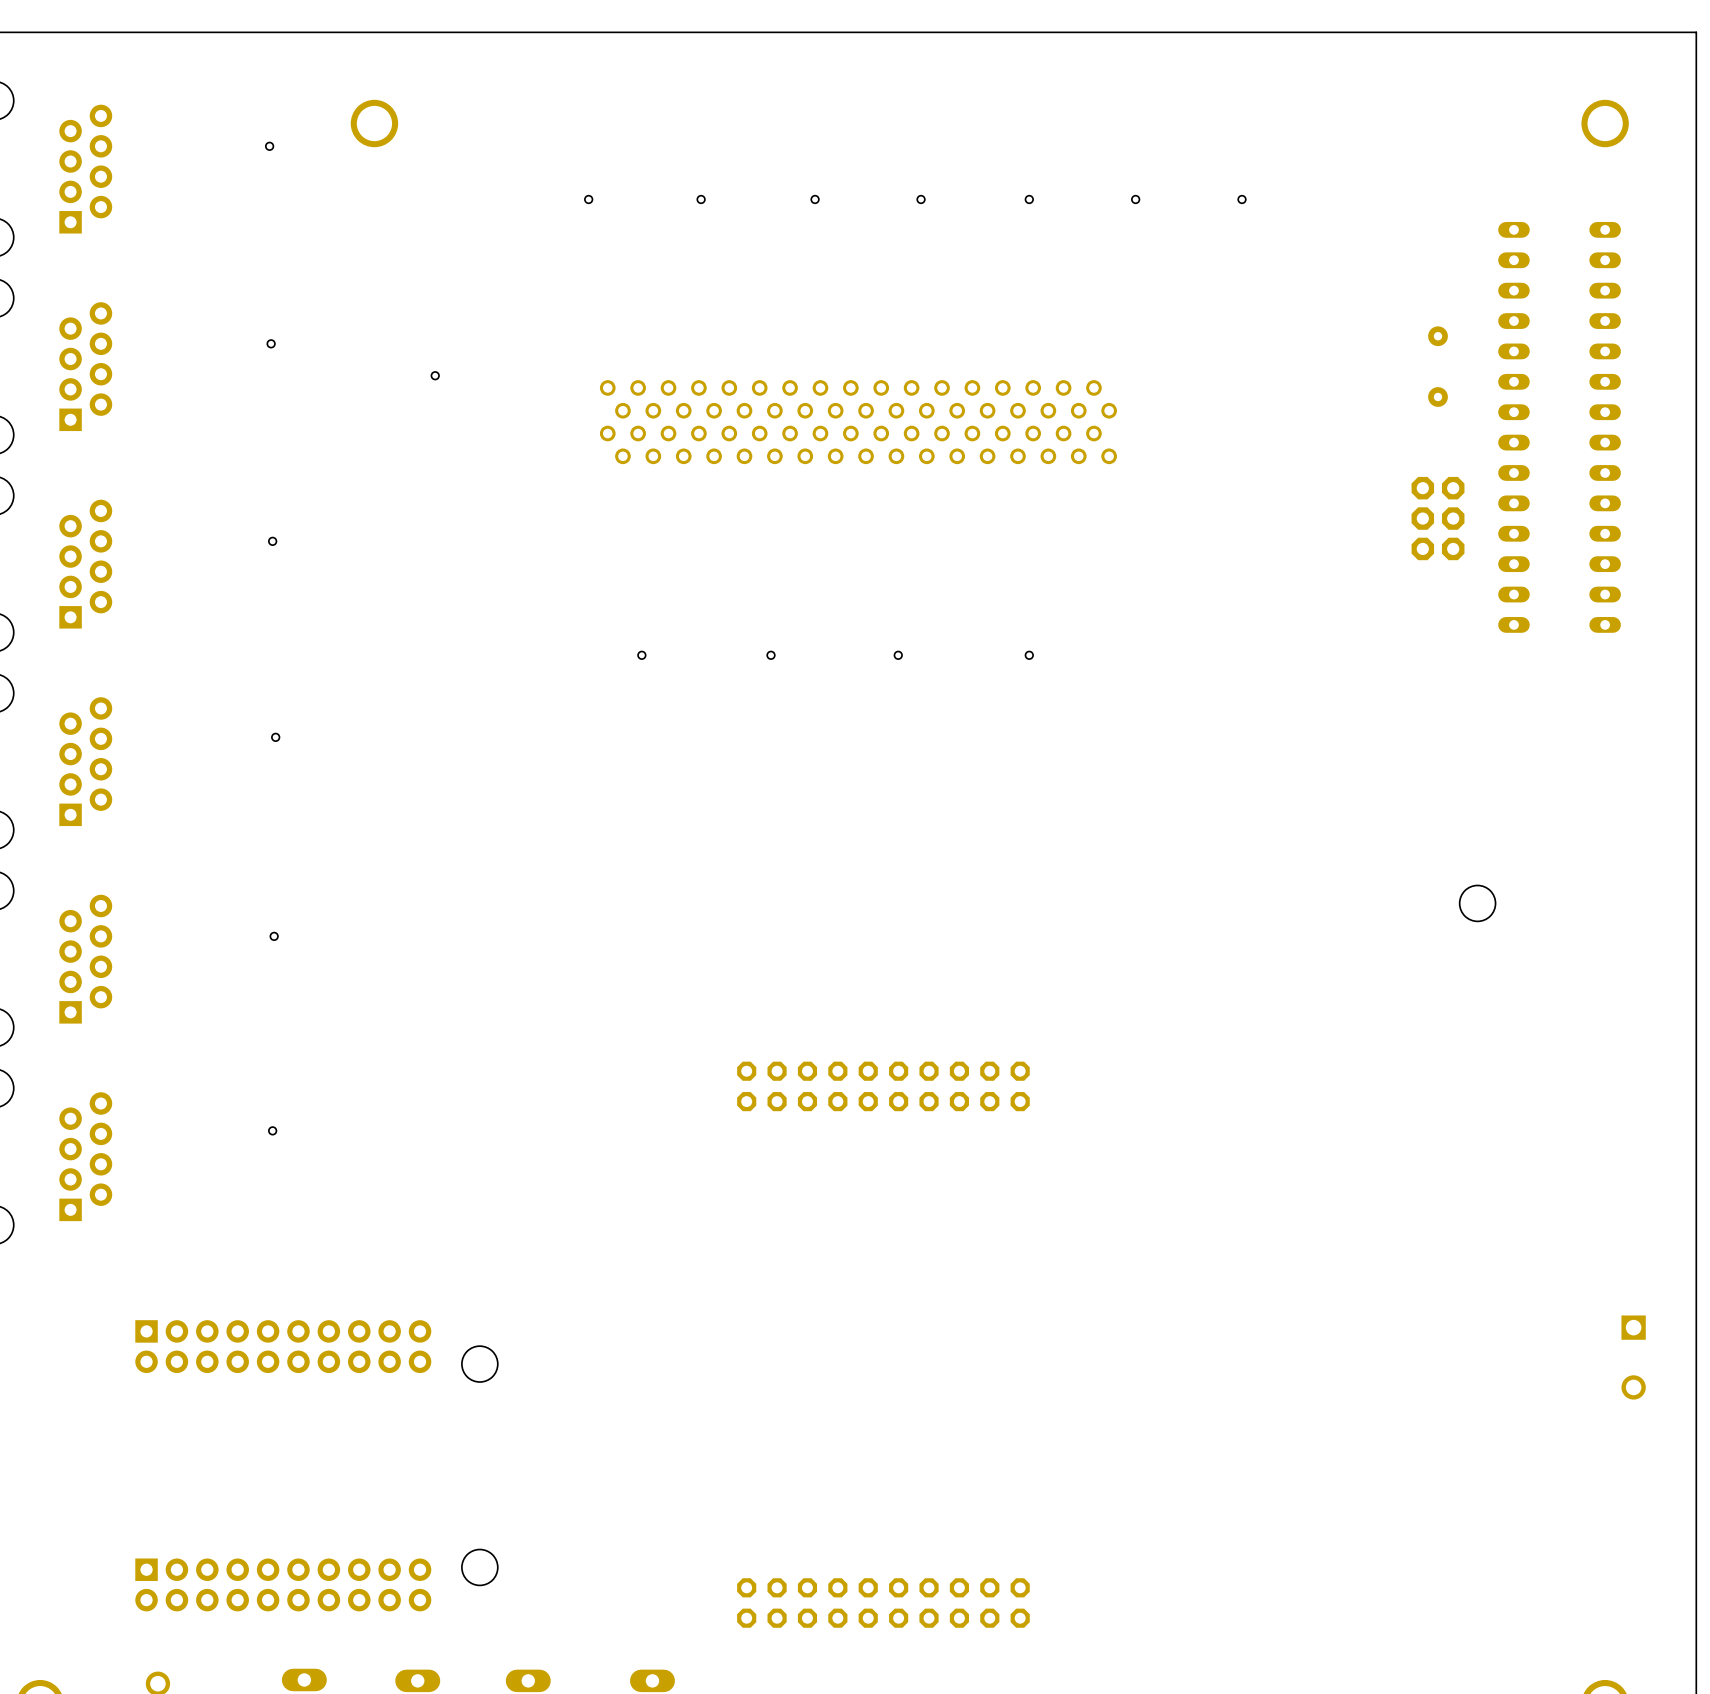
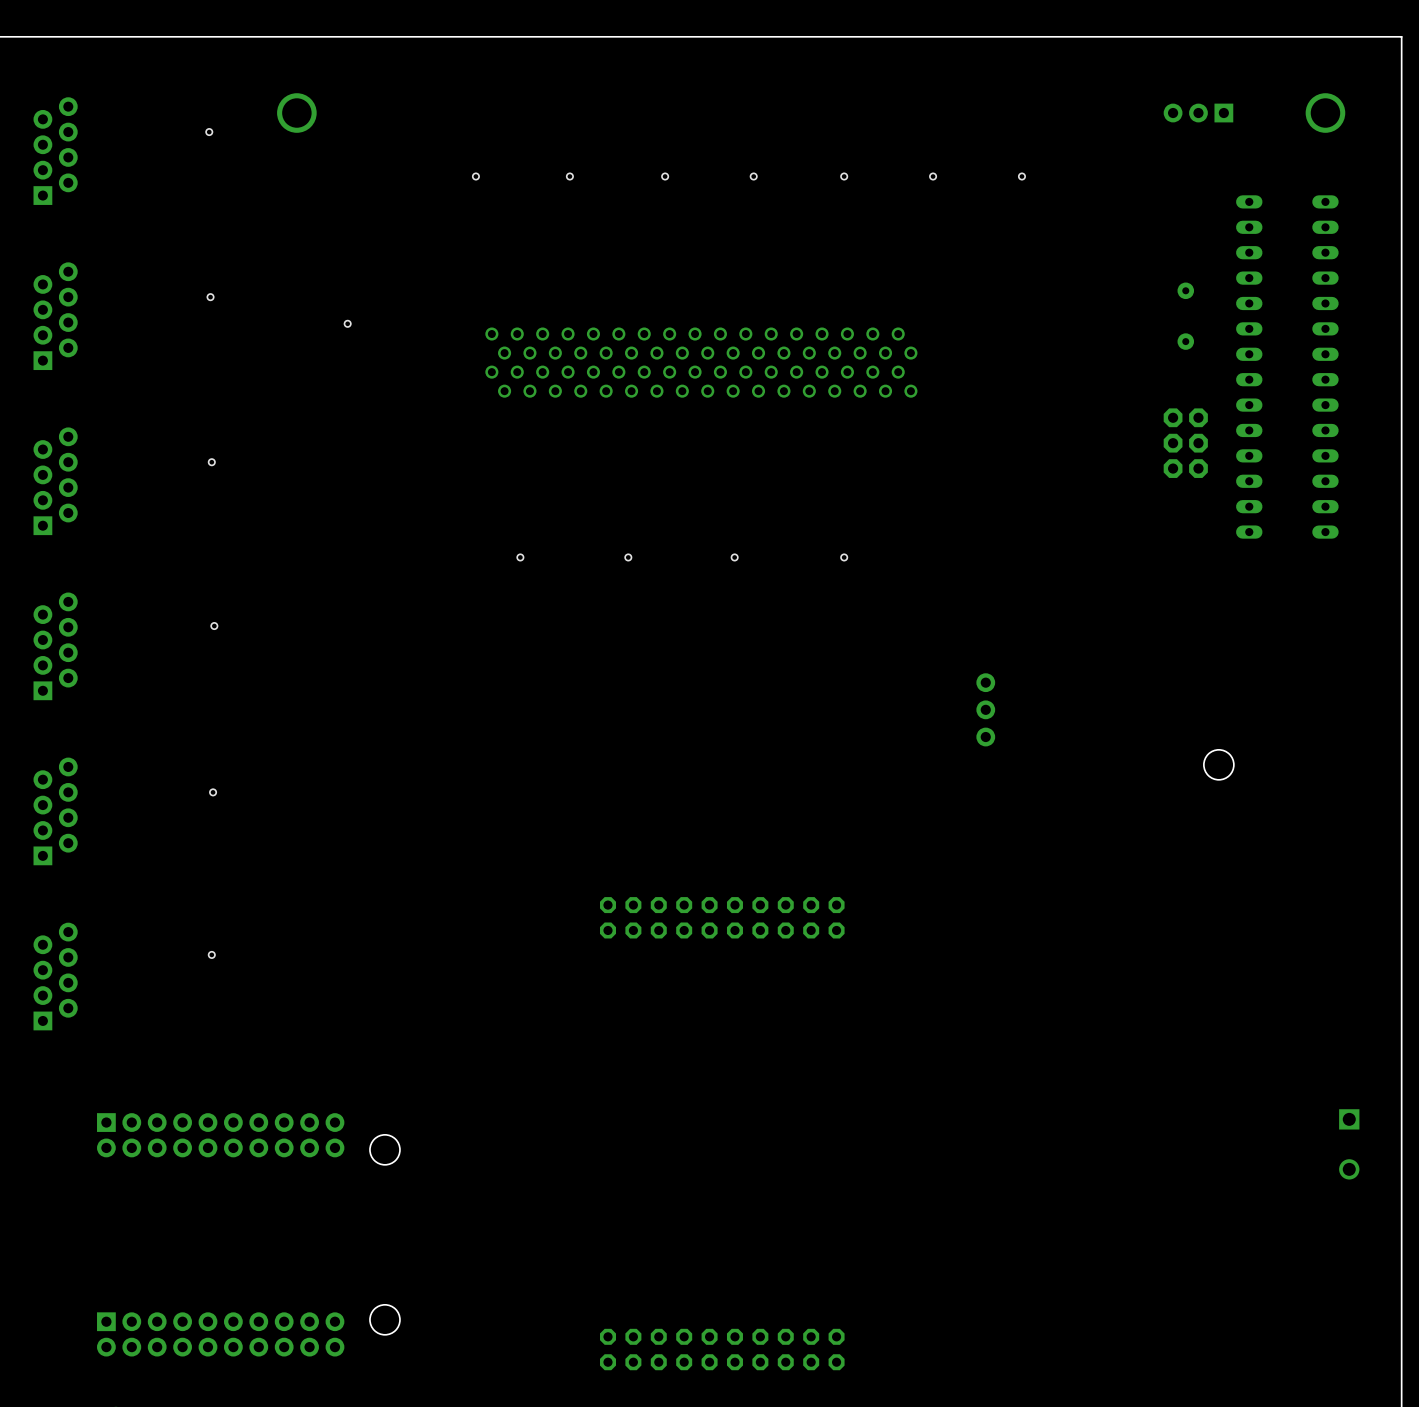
part: none -> (1198, 113)
part: none -> (985, 709)

